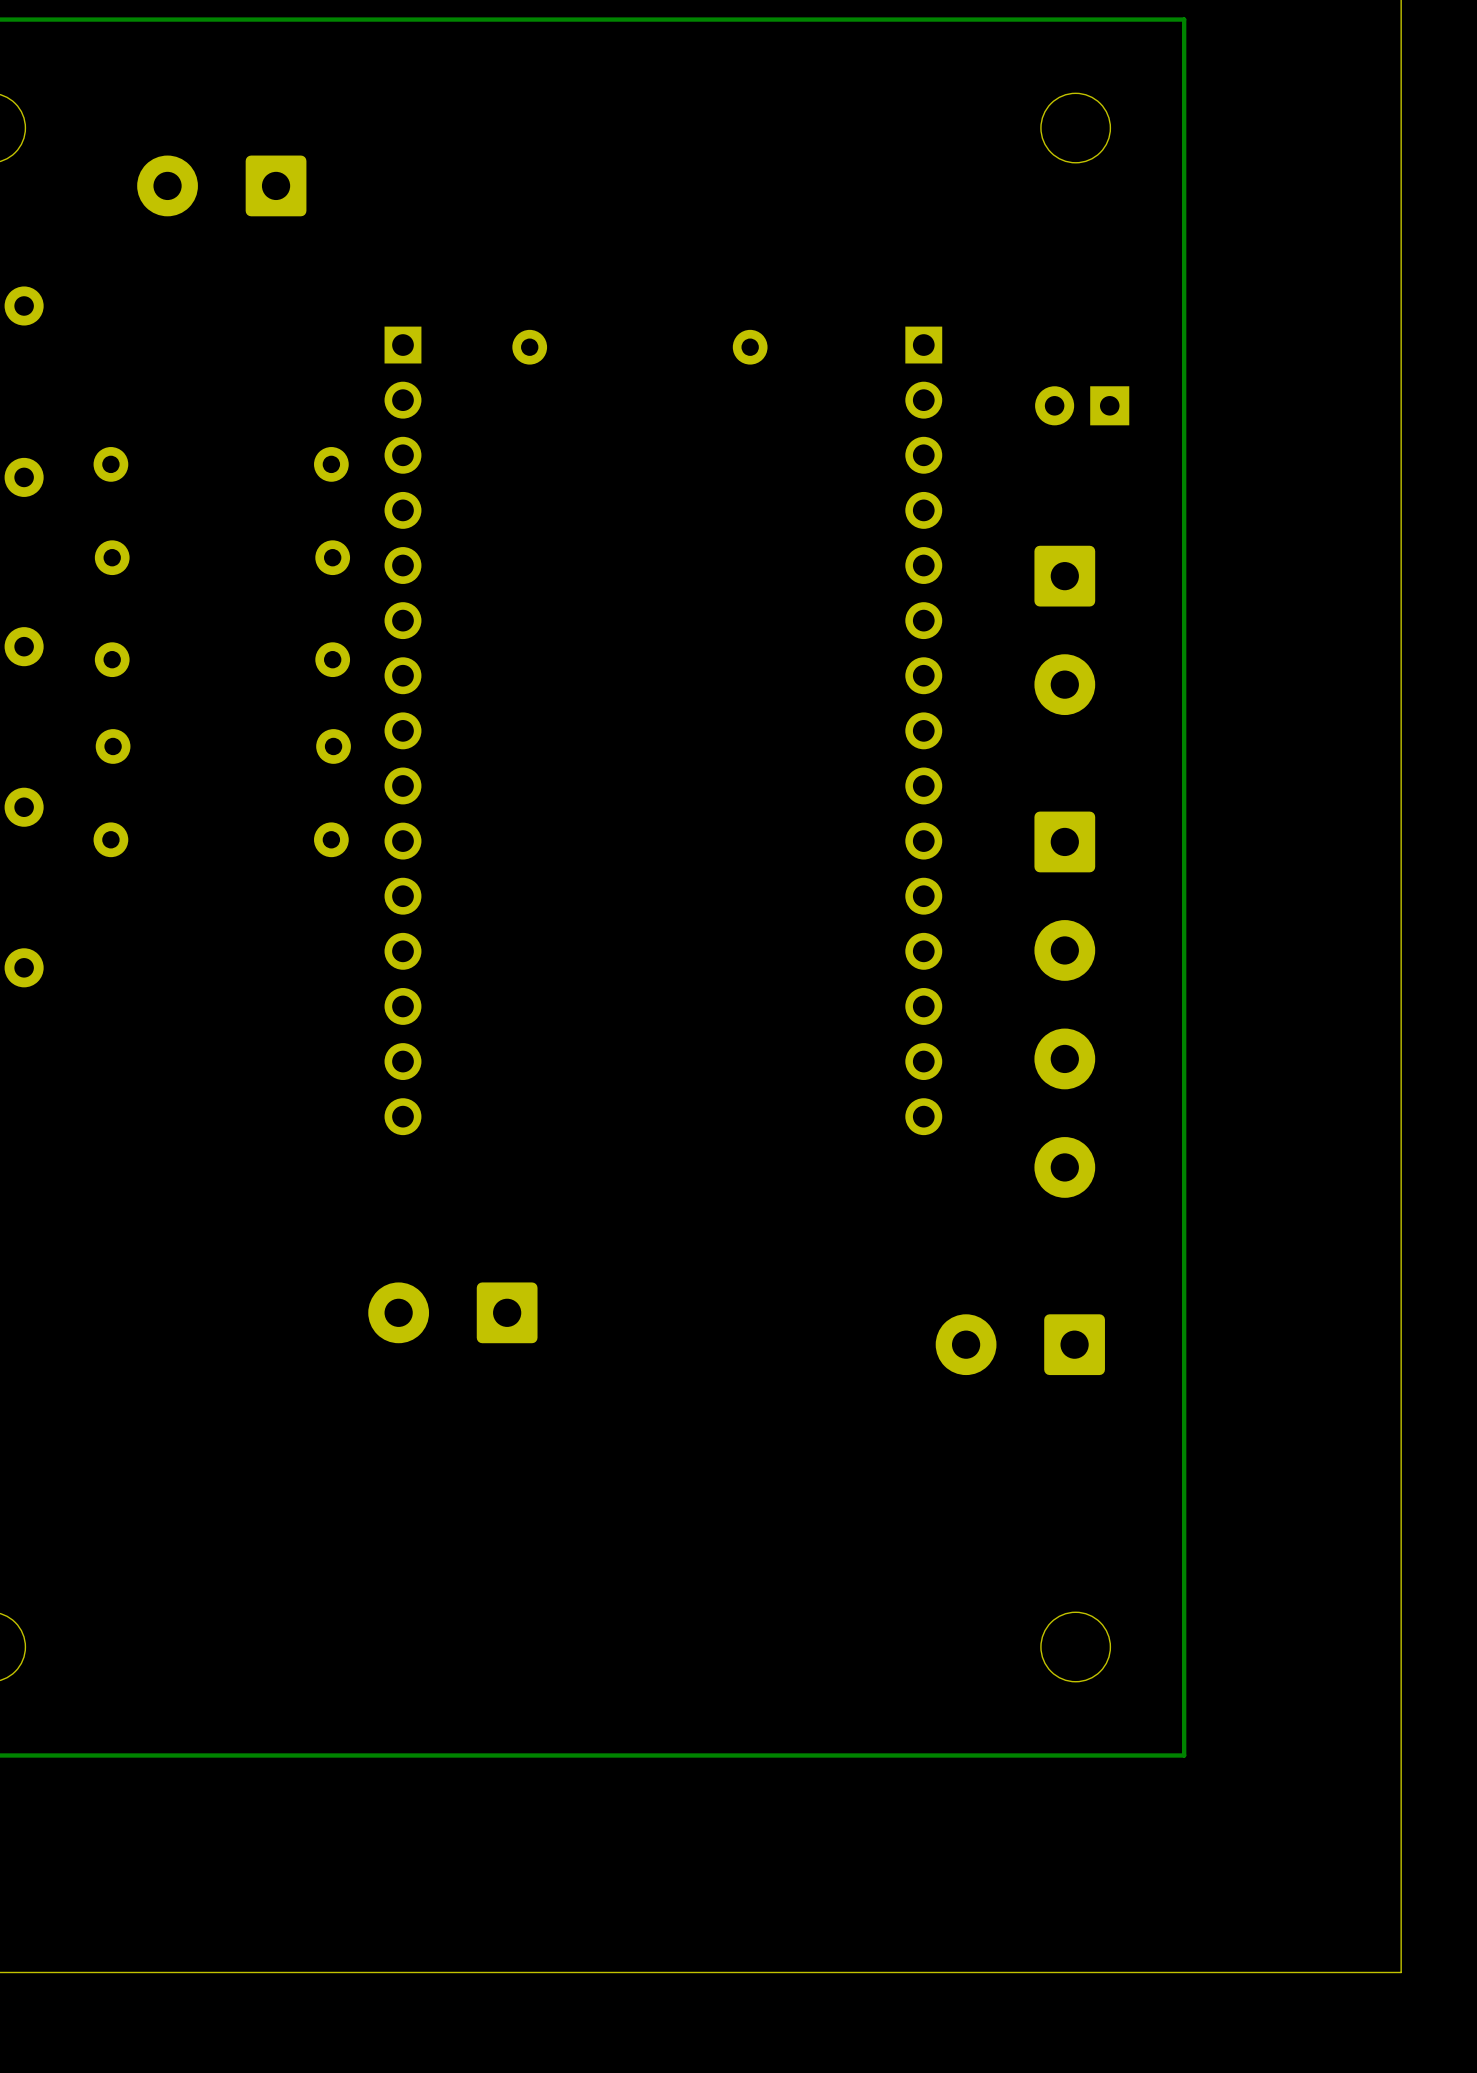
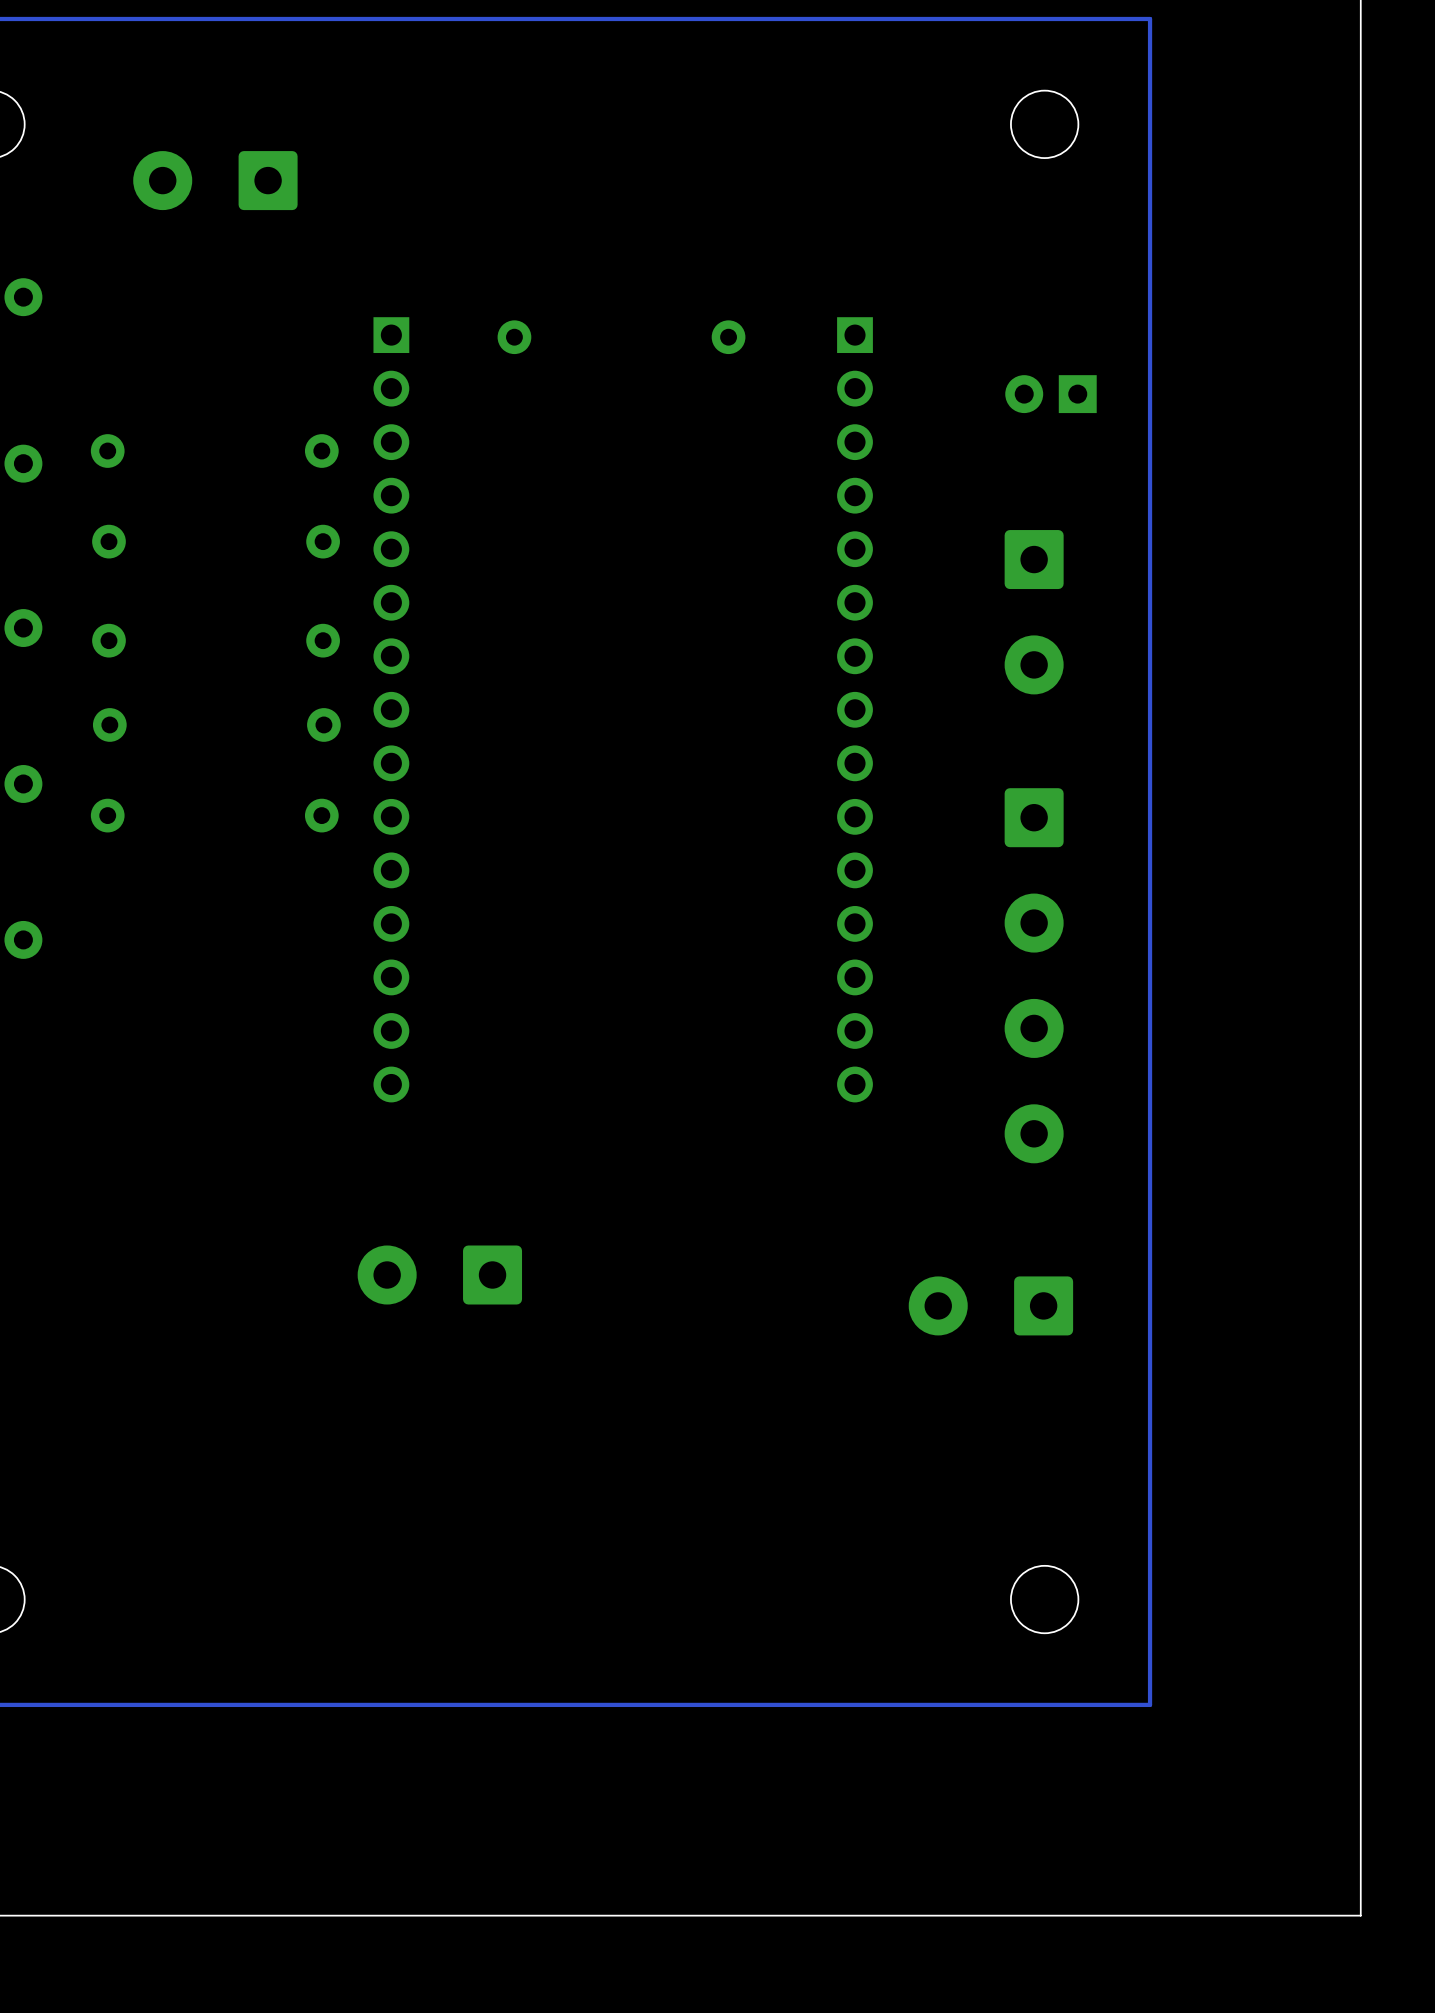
part position: (923, 730) -> (855, 709)

